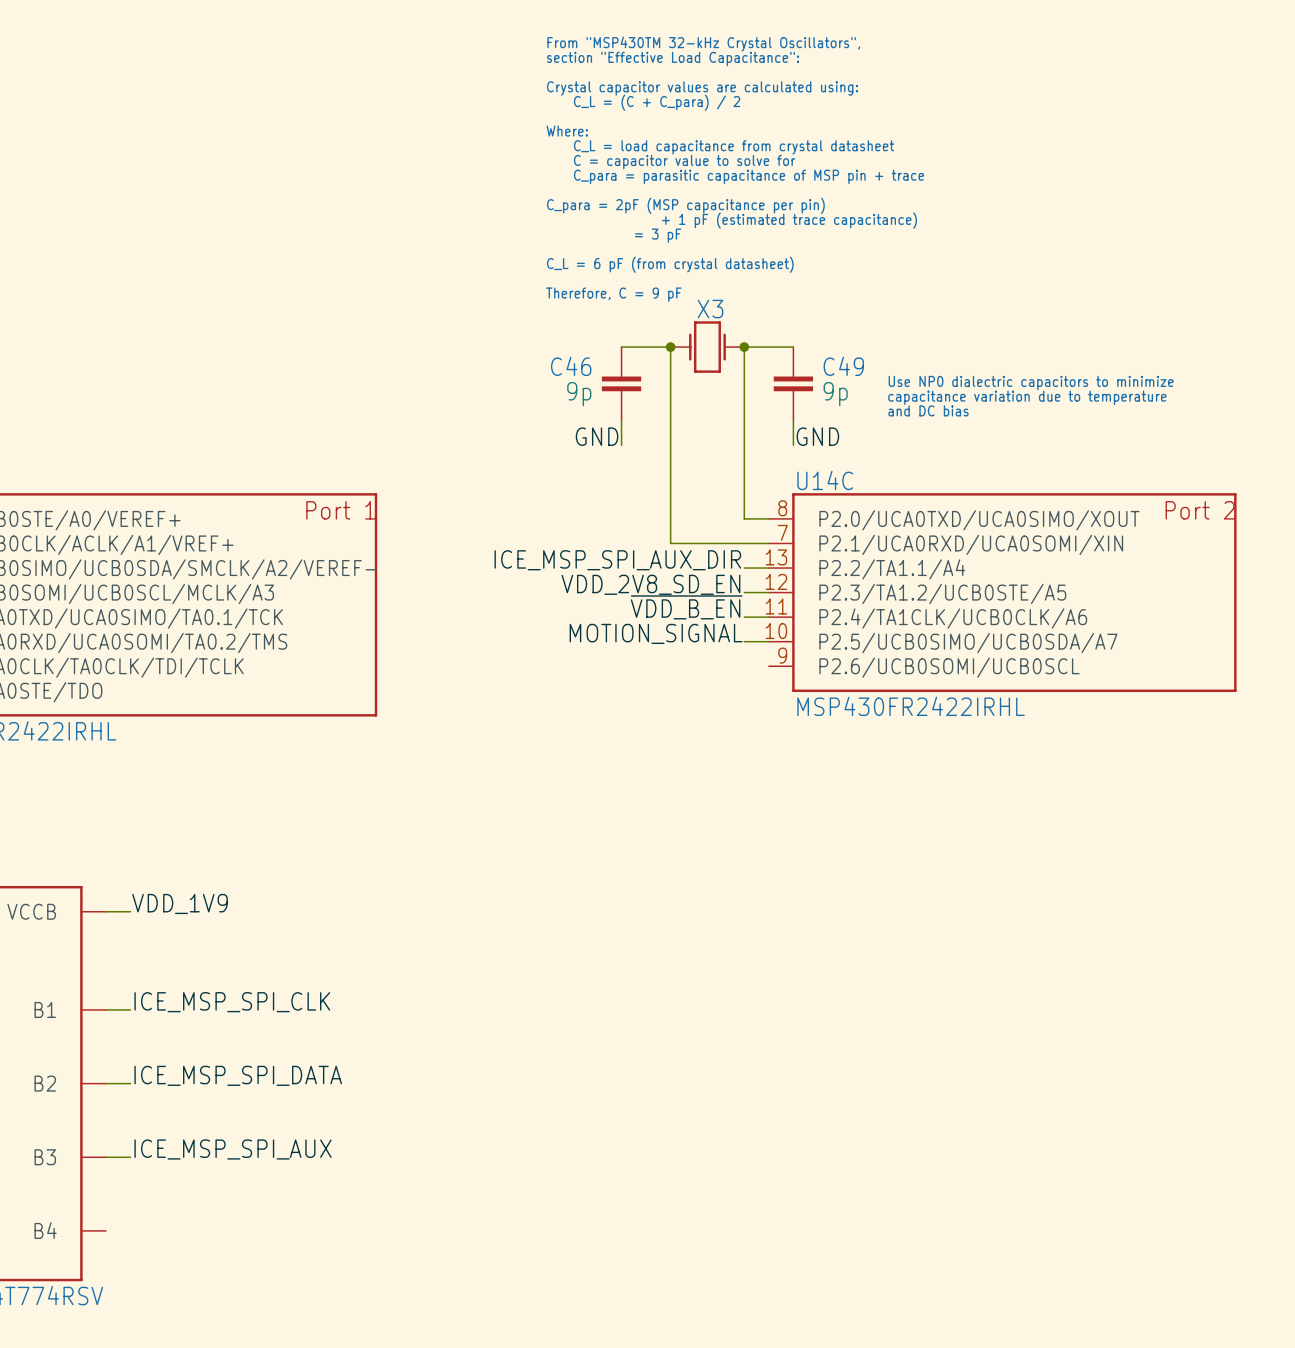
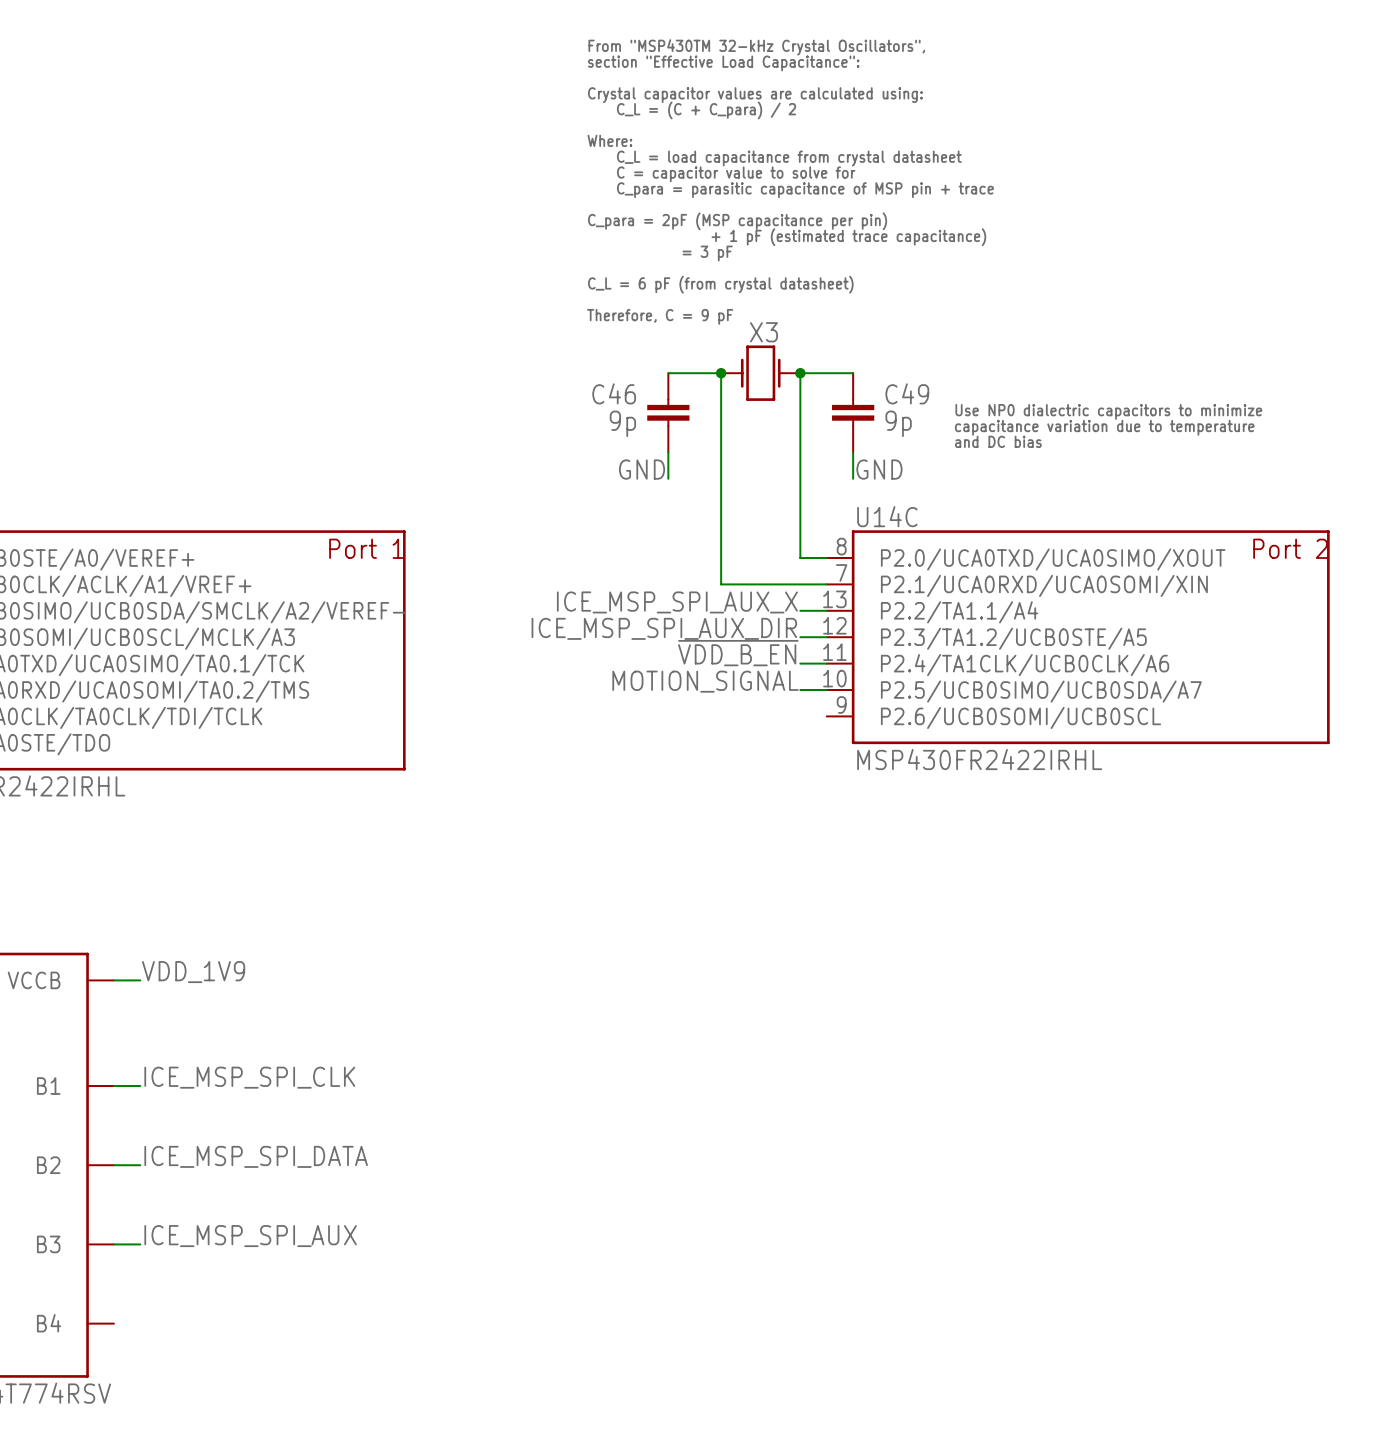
label: ICE_MSP_SPI_AUX_DIR (617, 560) -> ICE_MSP_SPI_AUX_X (677, 602)
label: VDD_2V8_SD_EN (650, 584) -> ICE_MSP_SPI_AUX_DIR (664, 628)

